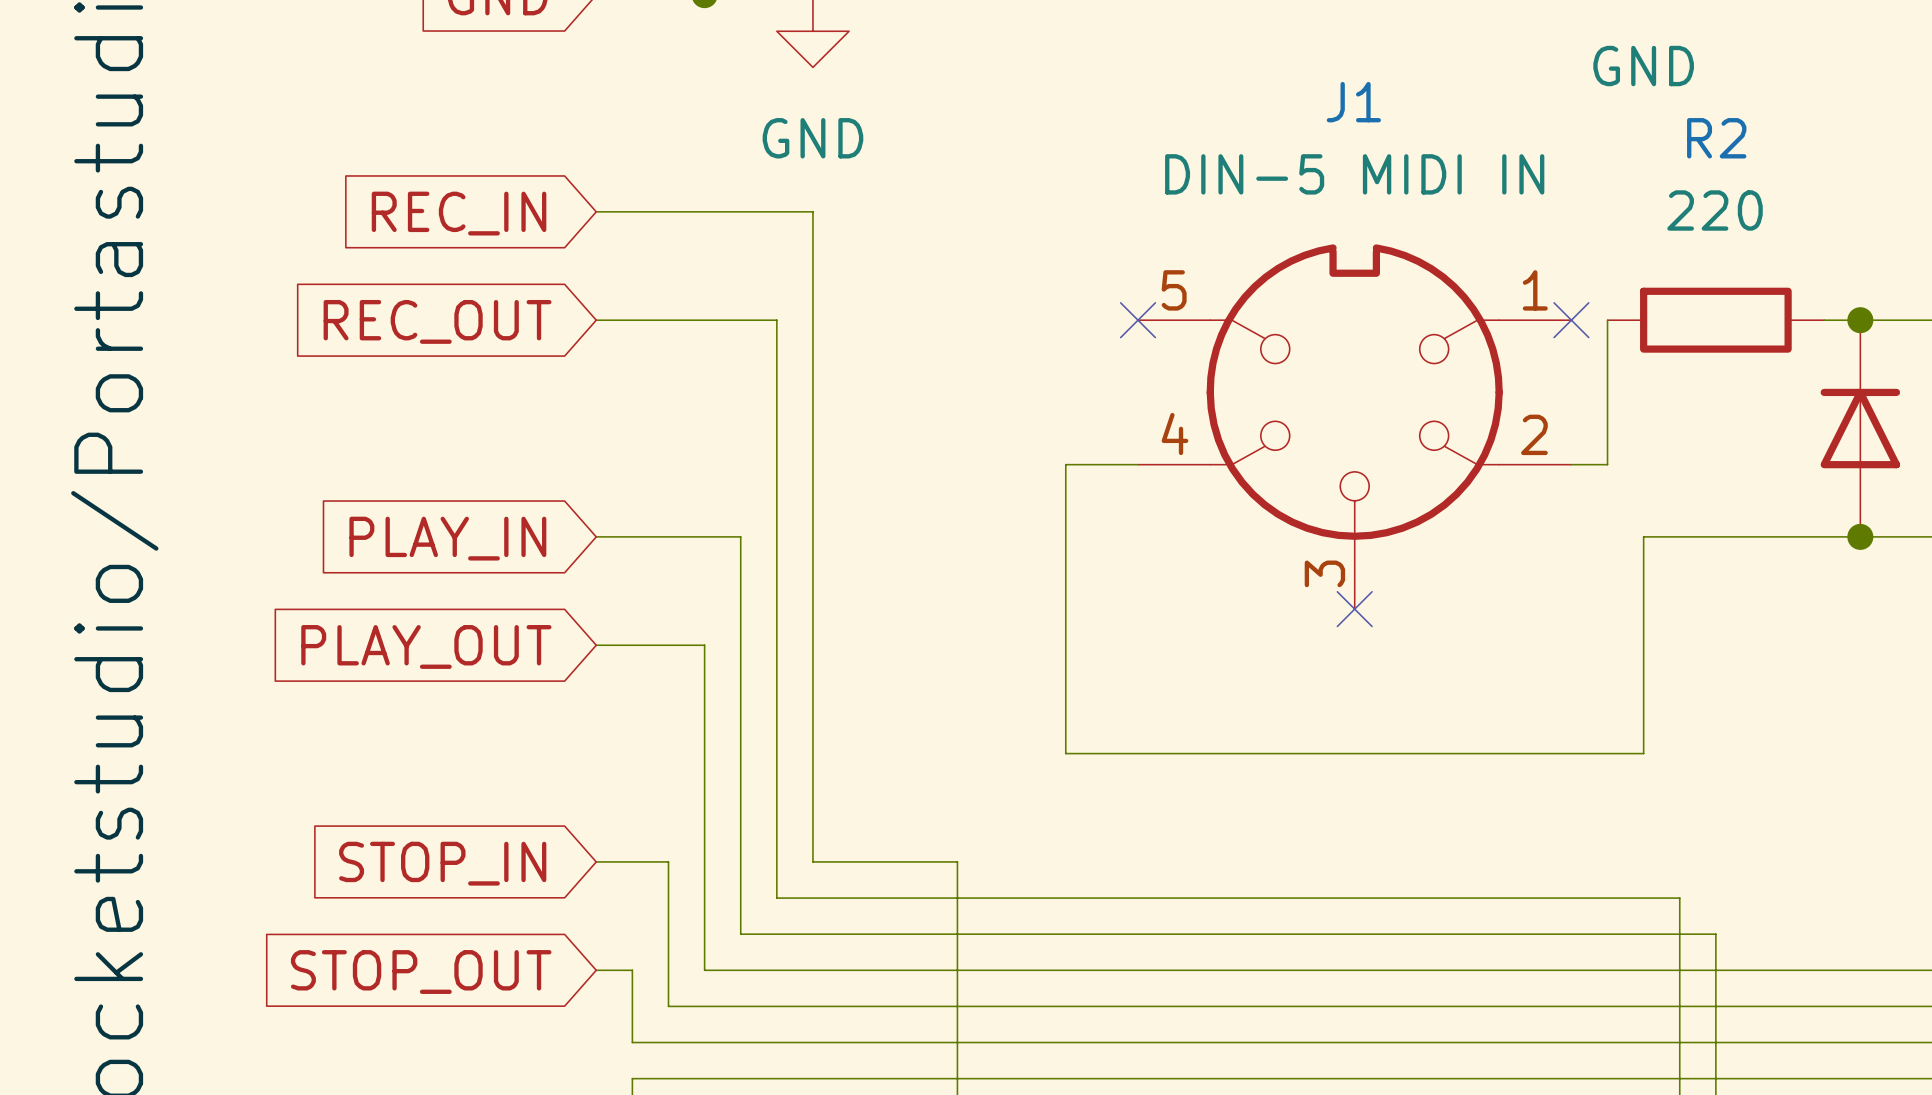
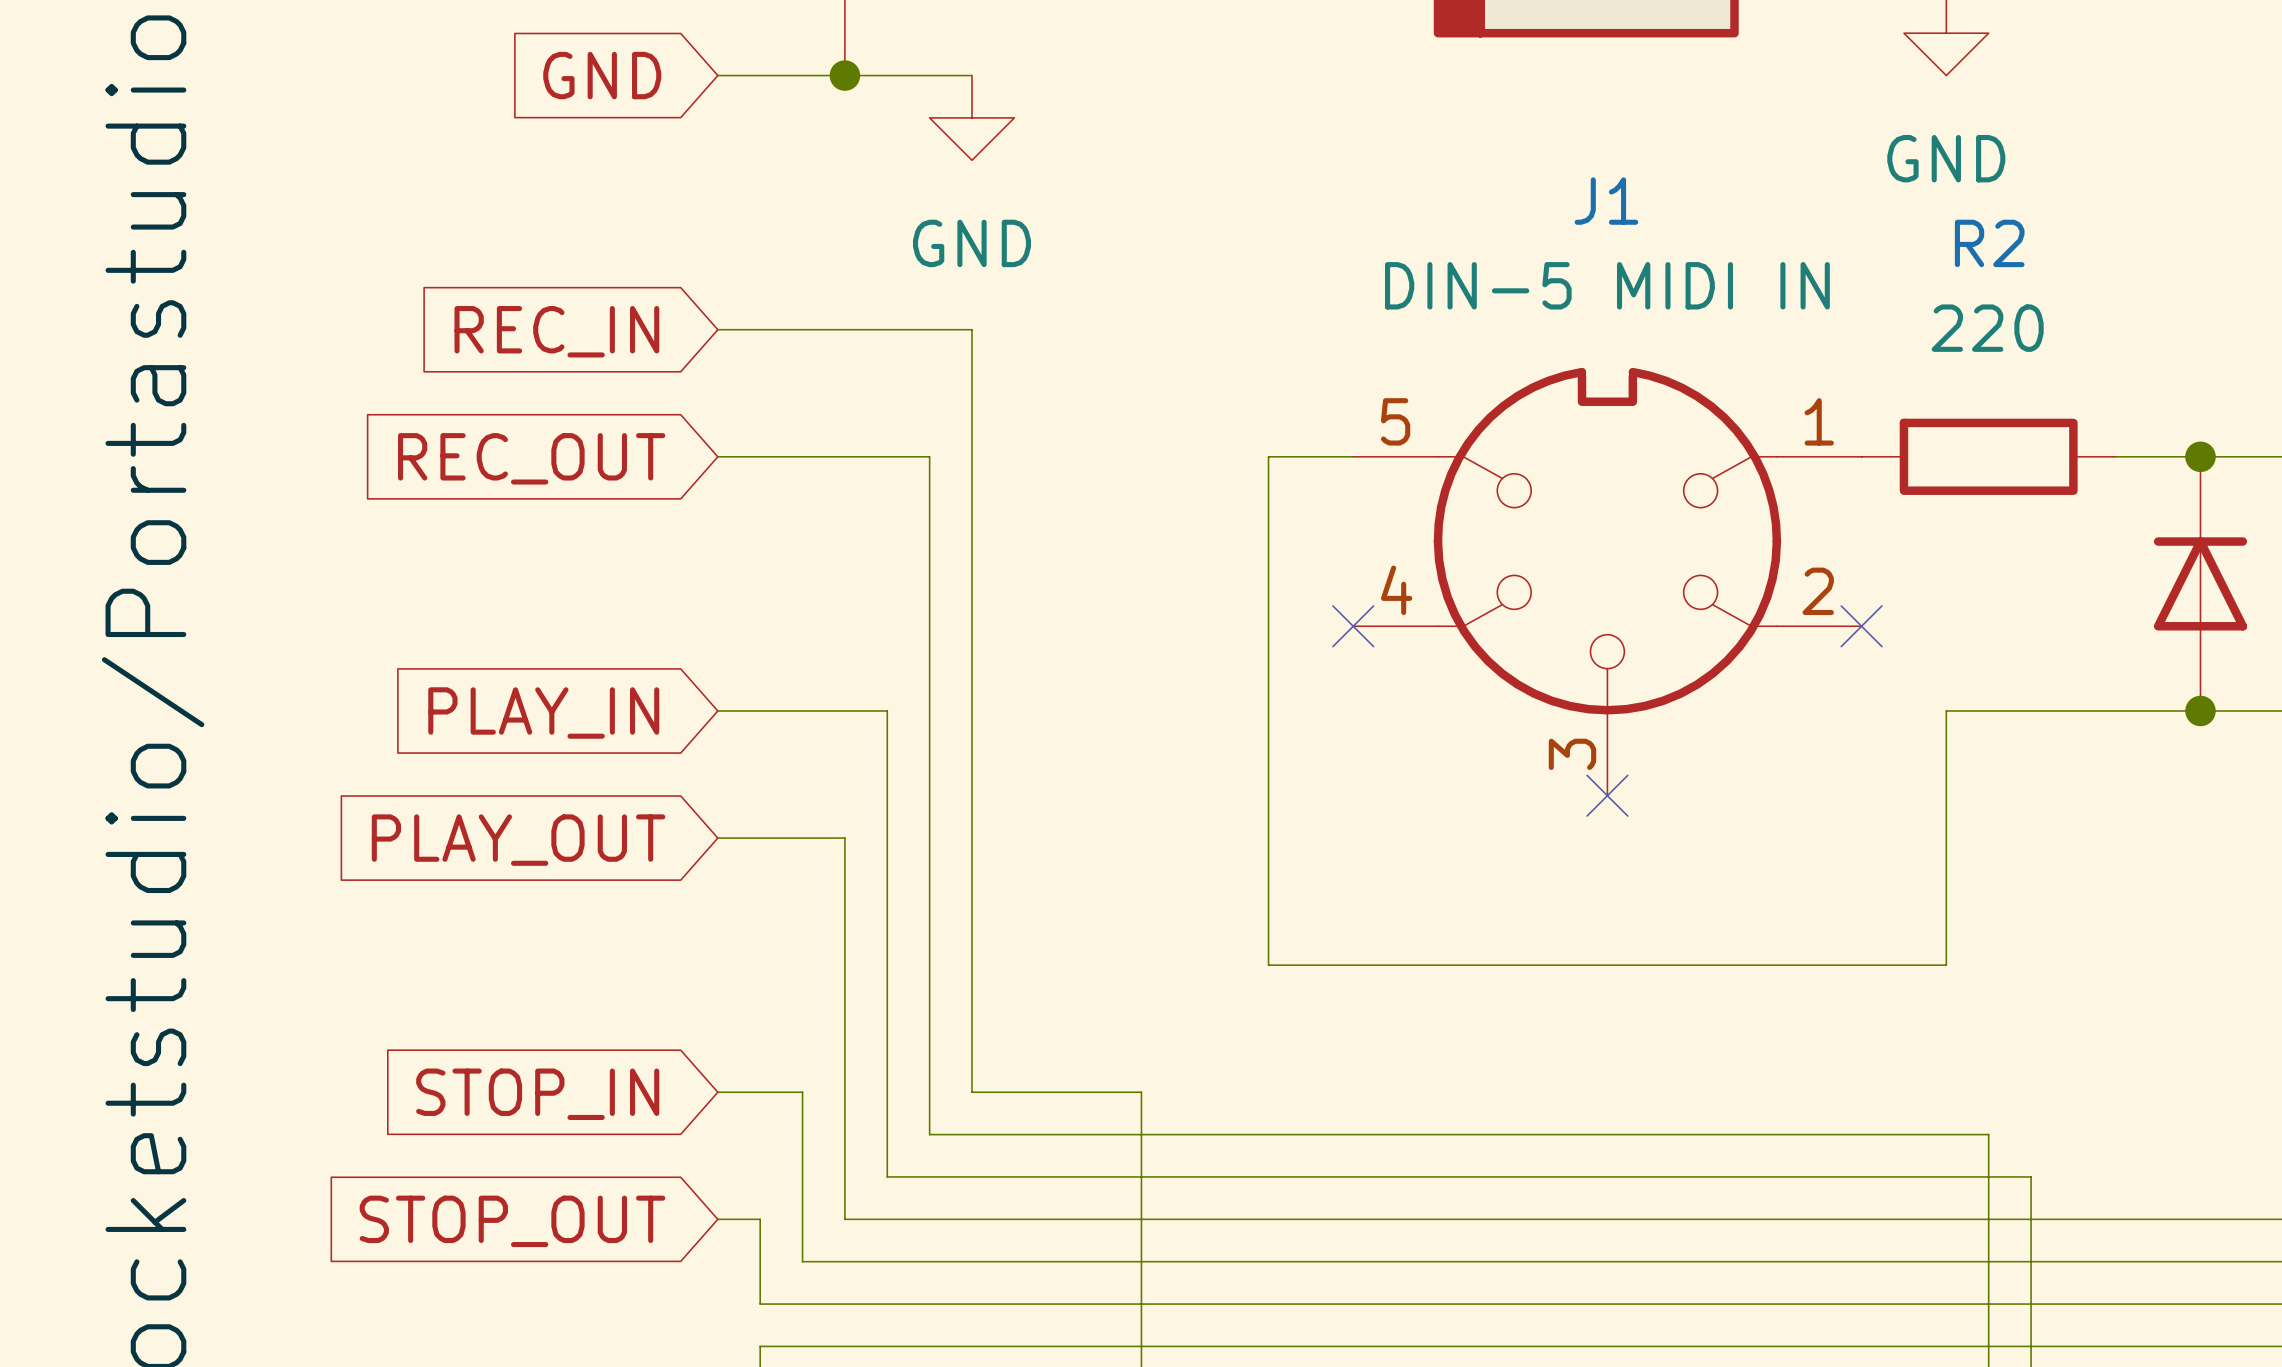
no-connect mark position: (1138, 320) -> (1353, 626)
no-connect mark position: (1571, 320) -> (1861, 626)
wire: (1607, 320) (1607, 464) (1571, 464) -> none
R2 position: (1715, 320) -> (1988, 456)
wire: (1065, 464) (1138, 464) -> (1268, 626) (1268, 456) (1353, 456)

